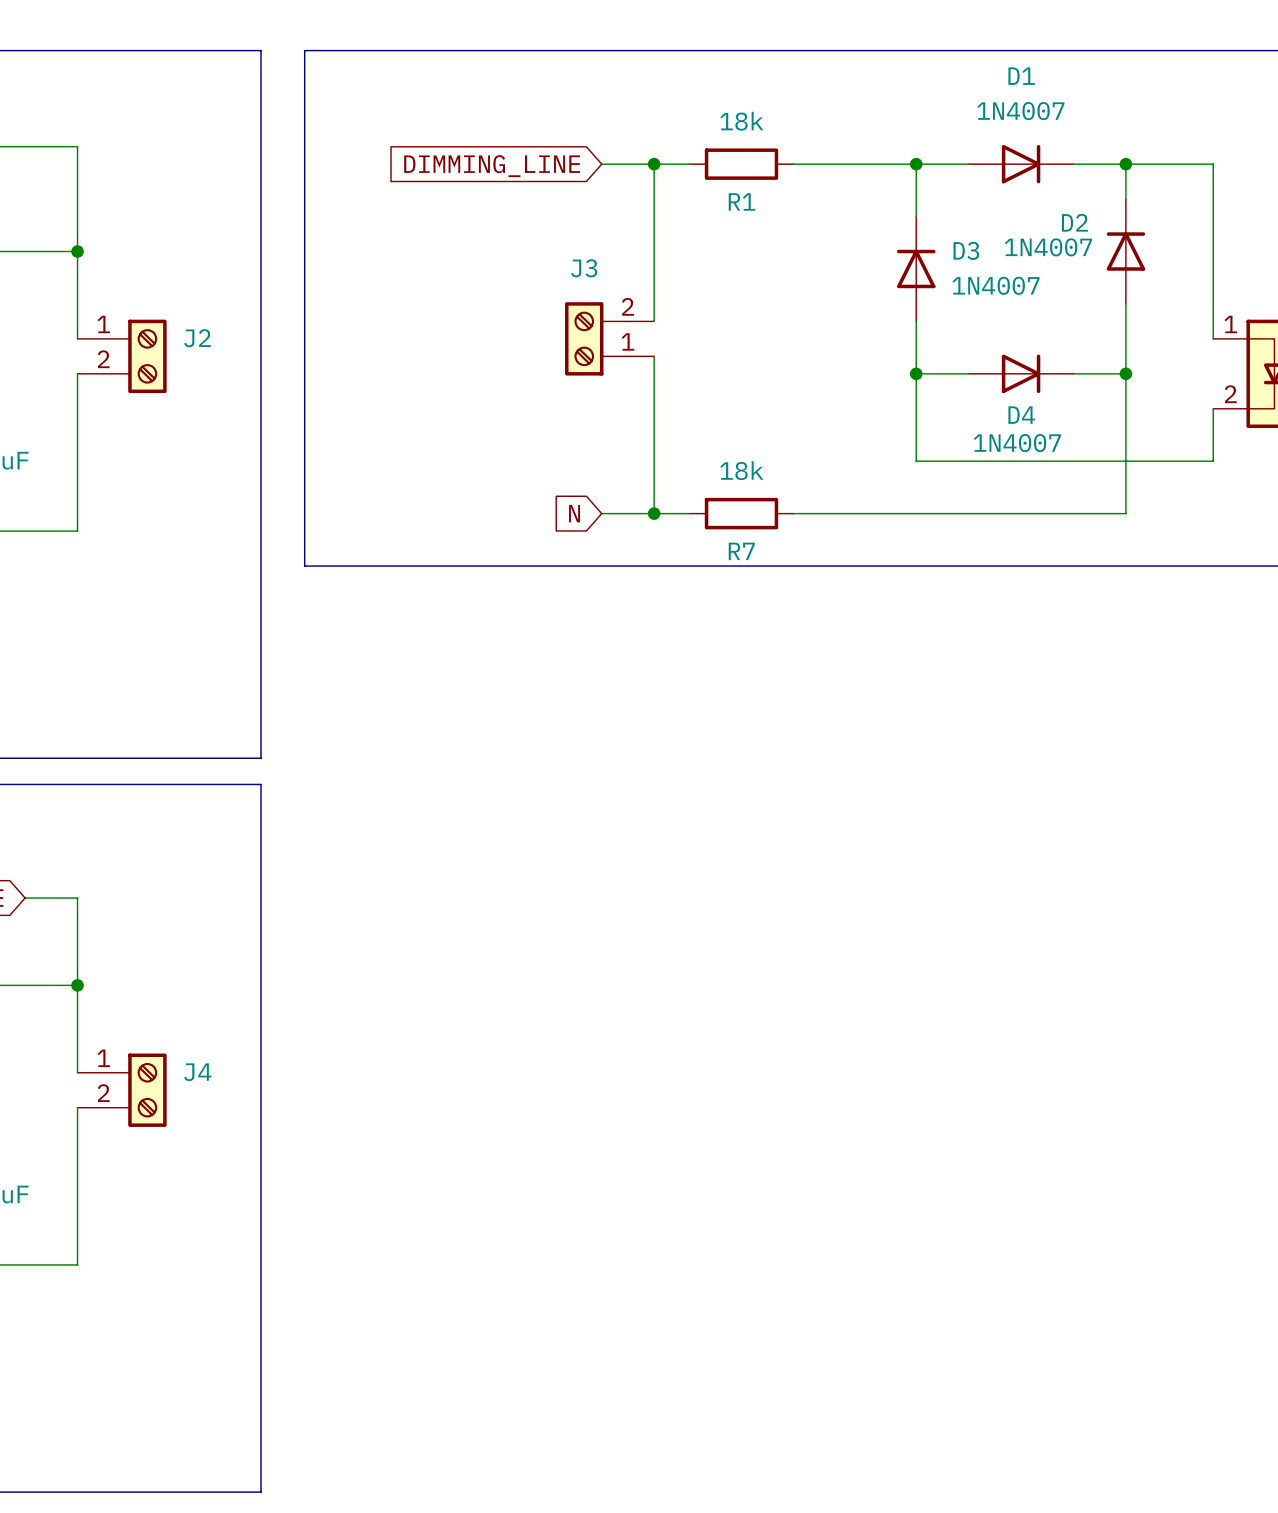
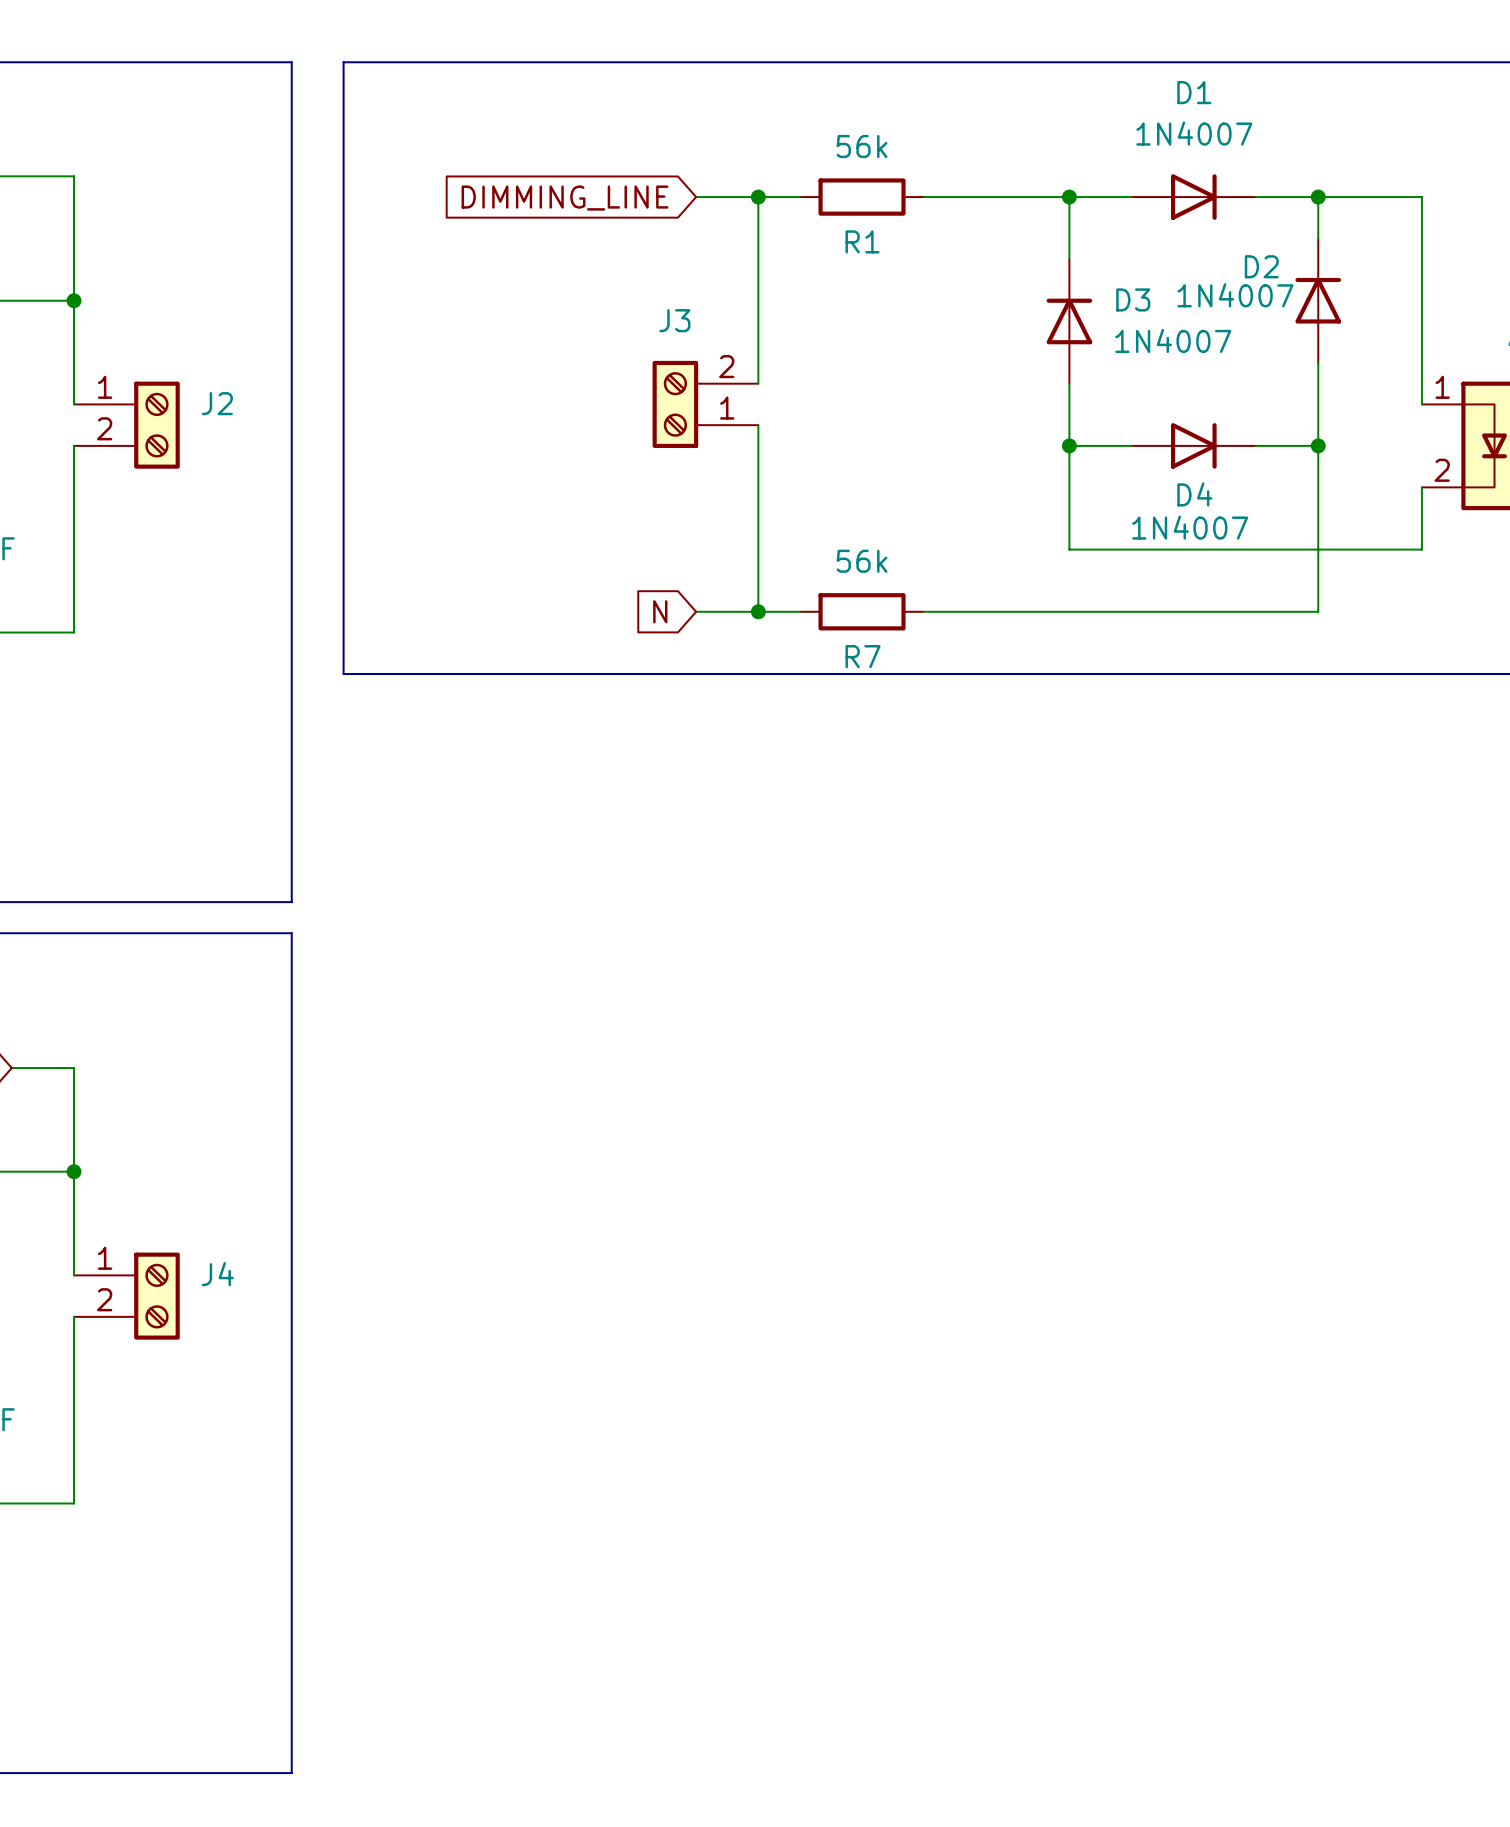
R1 value: 18k (741, 121) -> 56k (862, 146)
R7 value: 18k (741, 470) -> 56k (862, 561)

